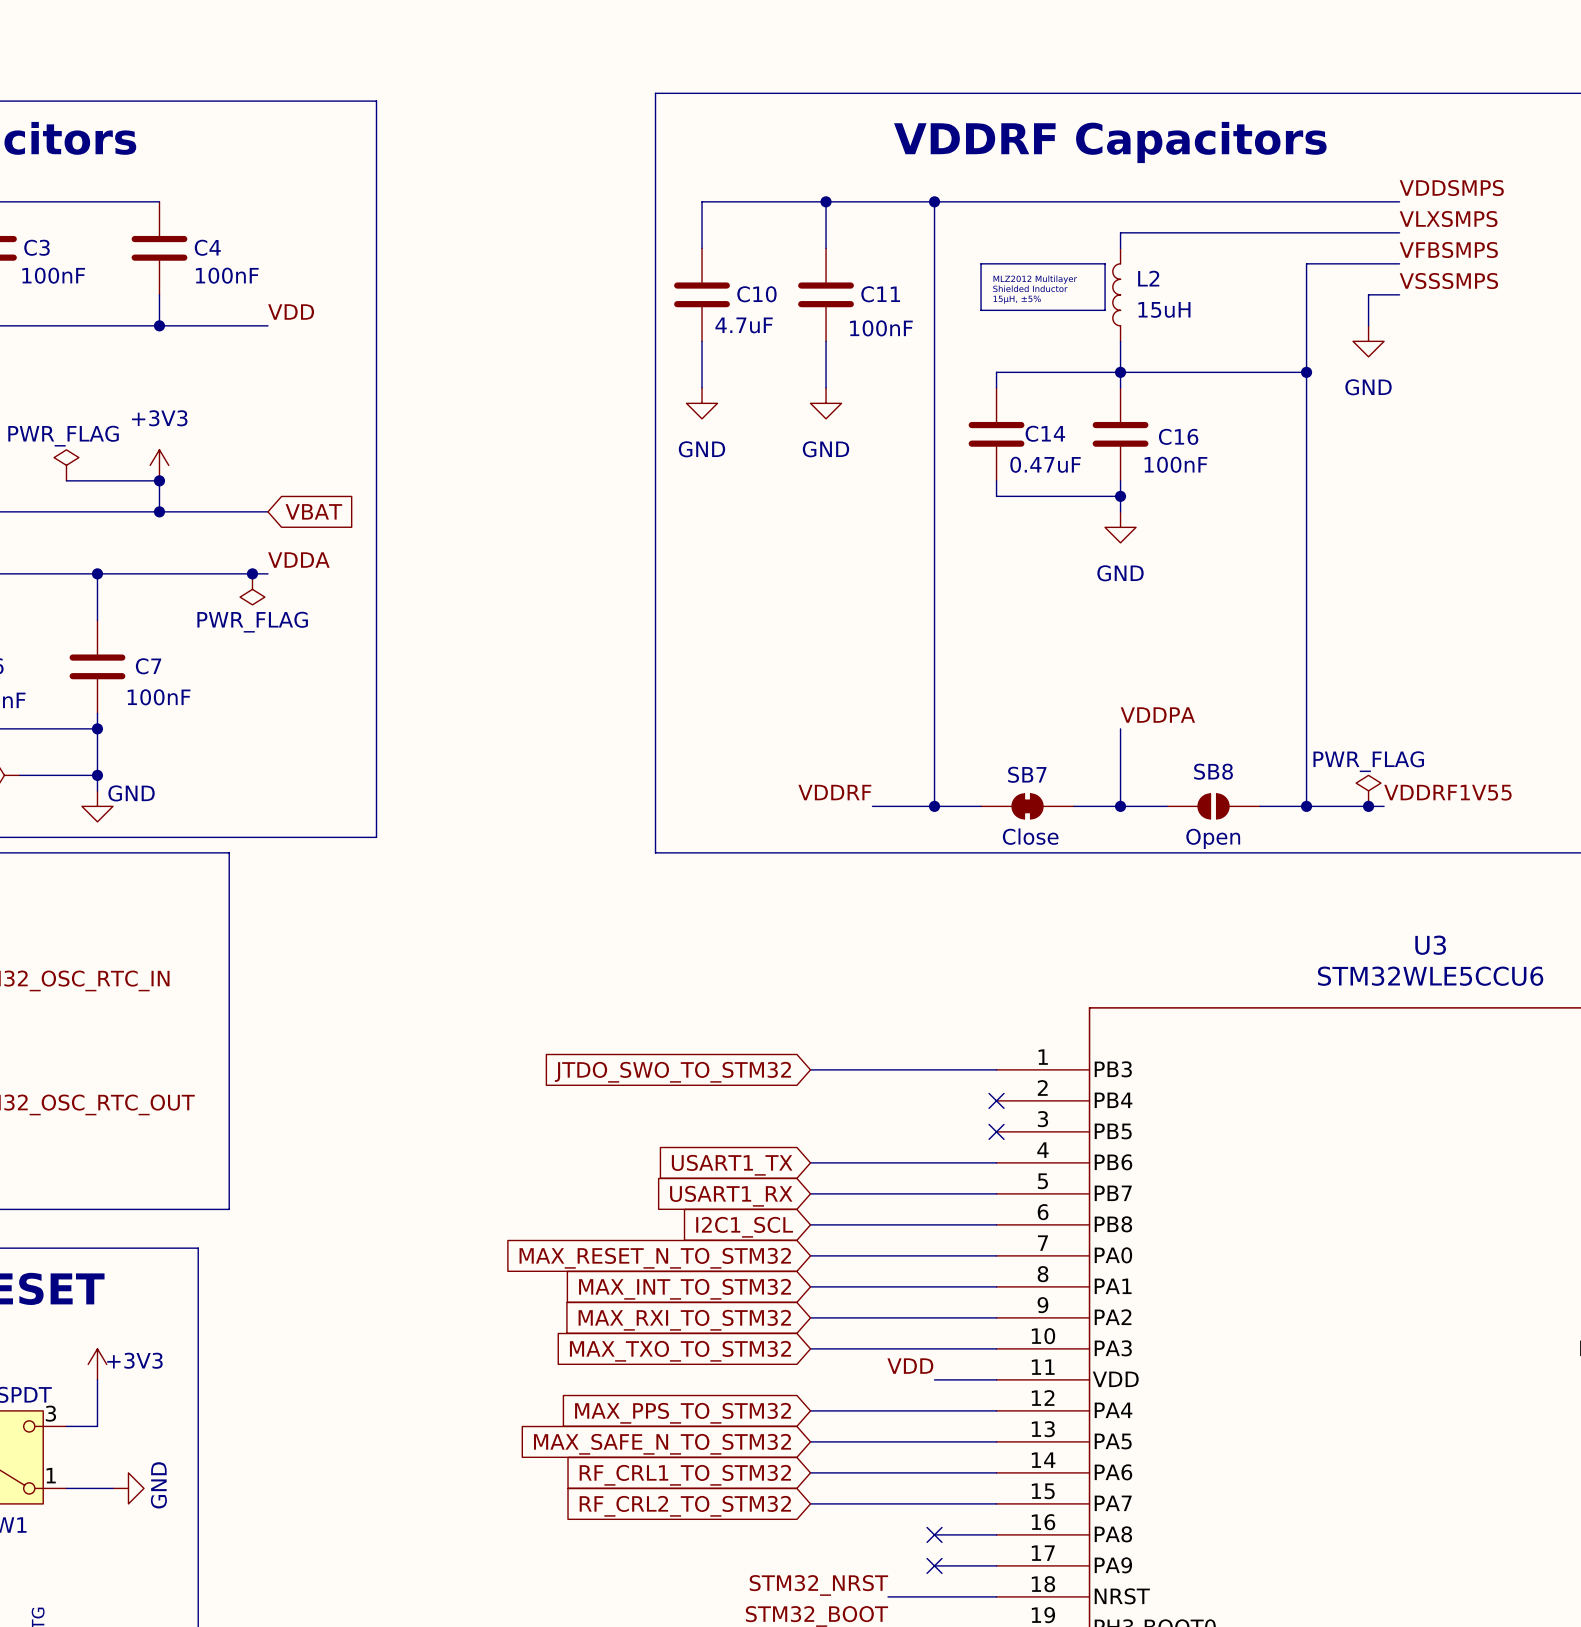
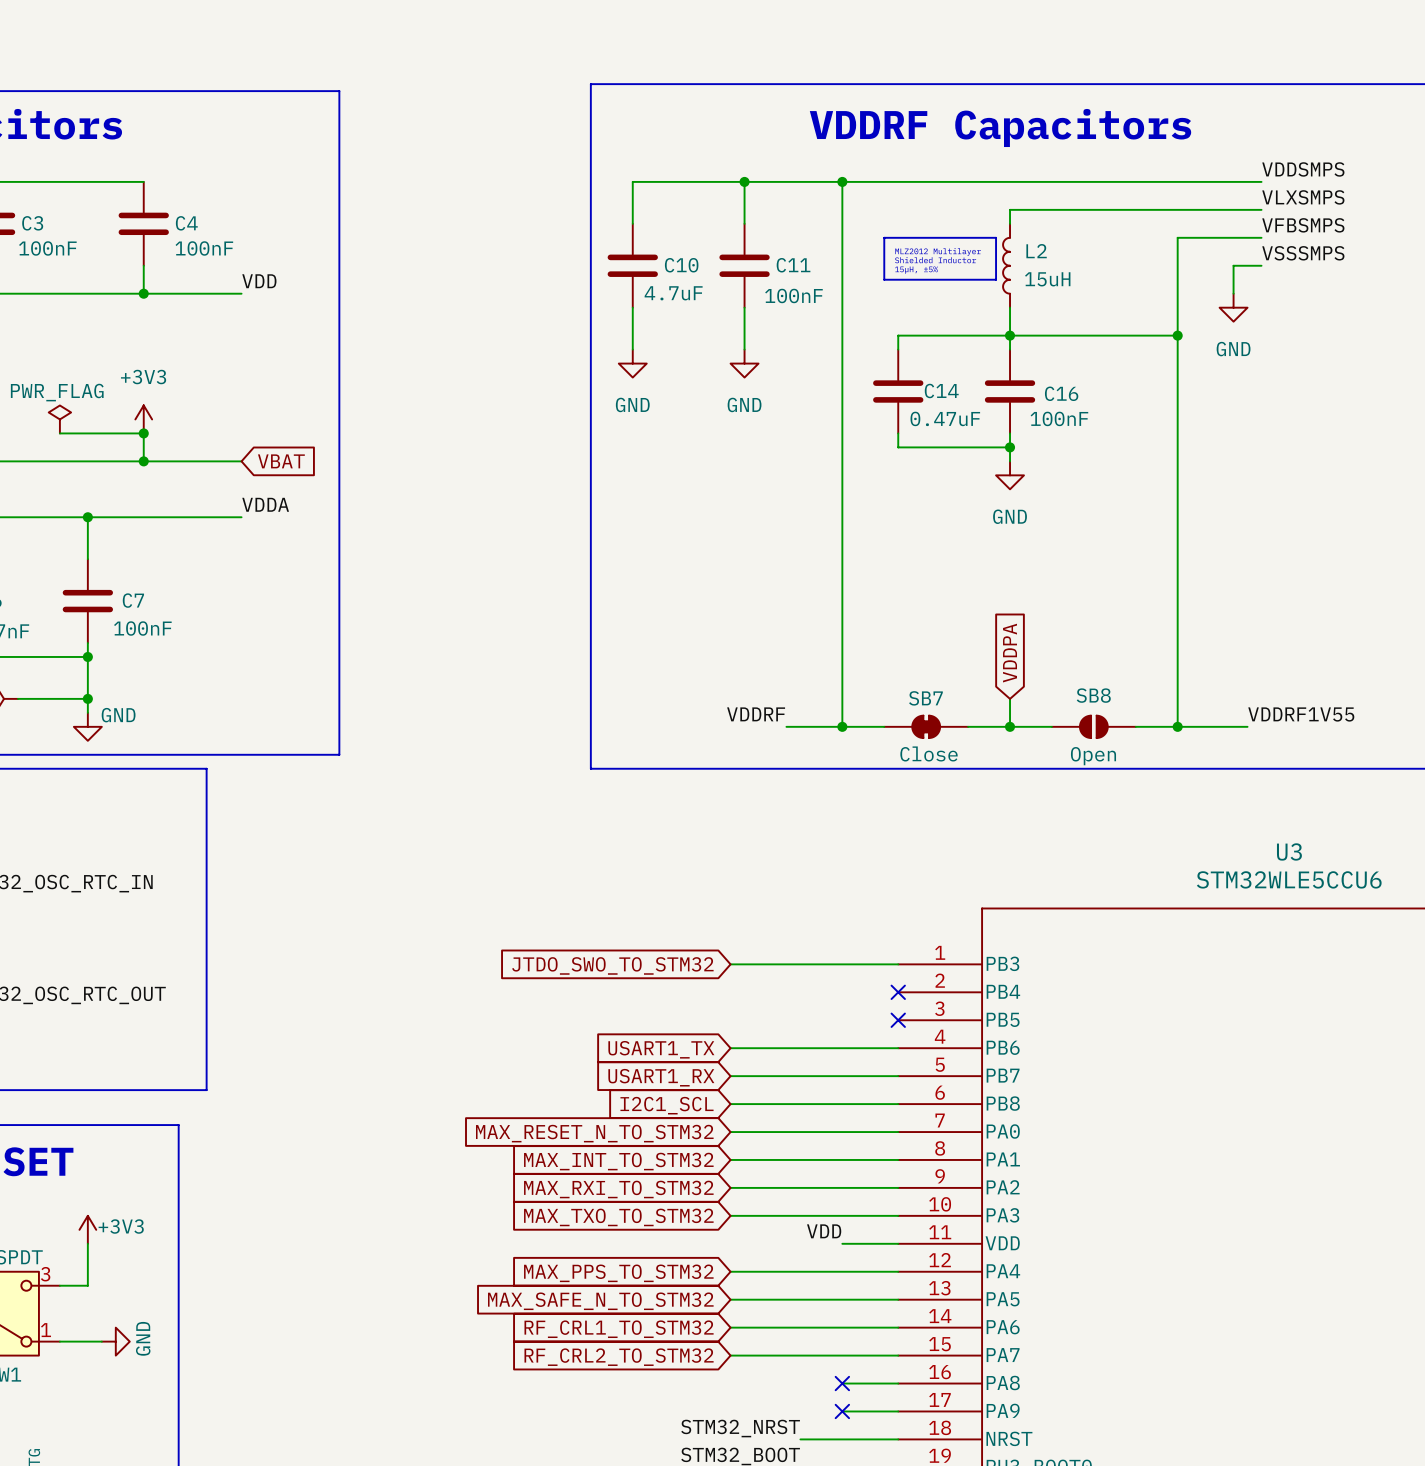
junction: (252, 573) -> none
power symbol: PWR_FLAG (252, 589) -> none
label: VDDPA (1157, 715) -> none
global label: none -> VDDPA (1010, 653)
wire: (1120, 728) (1120, 775) -> none
power symbol: PWR_FLAG (1368, 790) -> none
junction: (1368, 806) -> none

